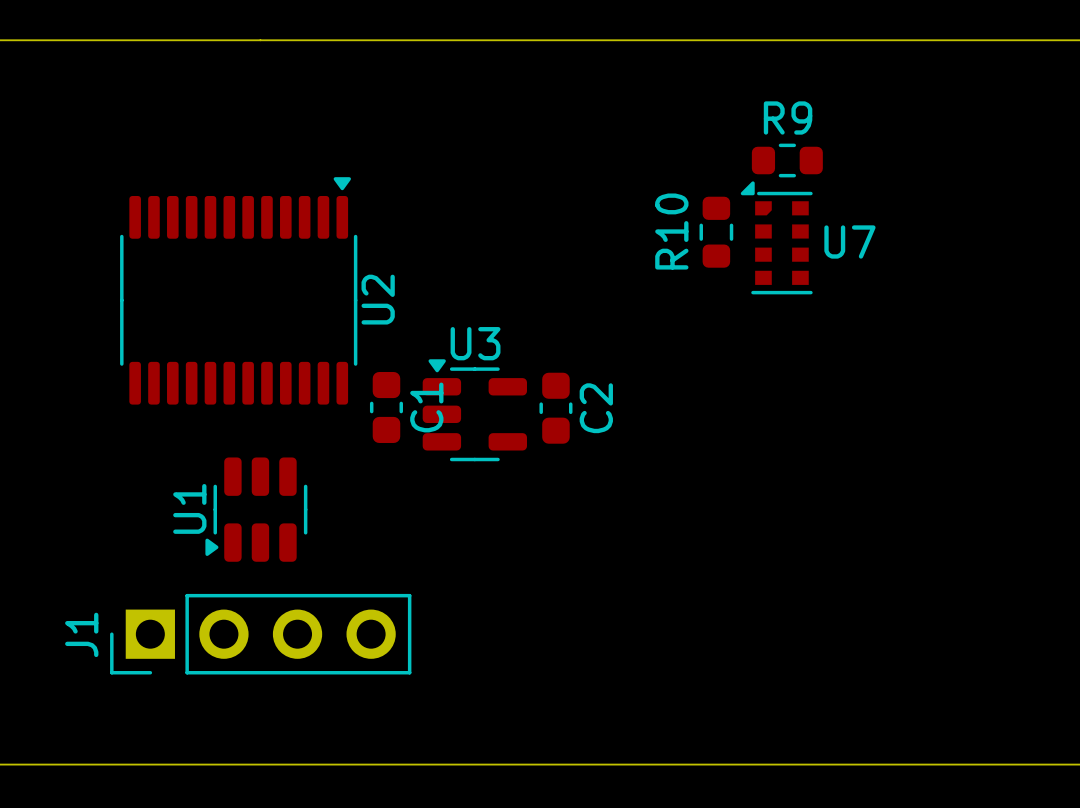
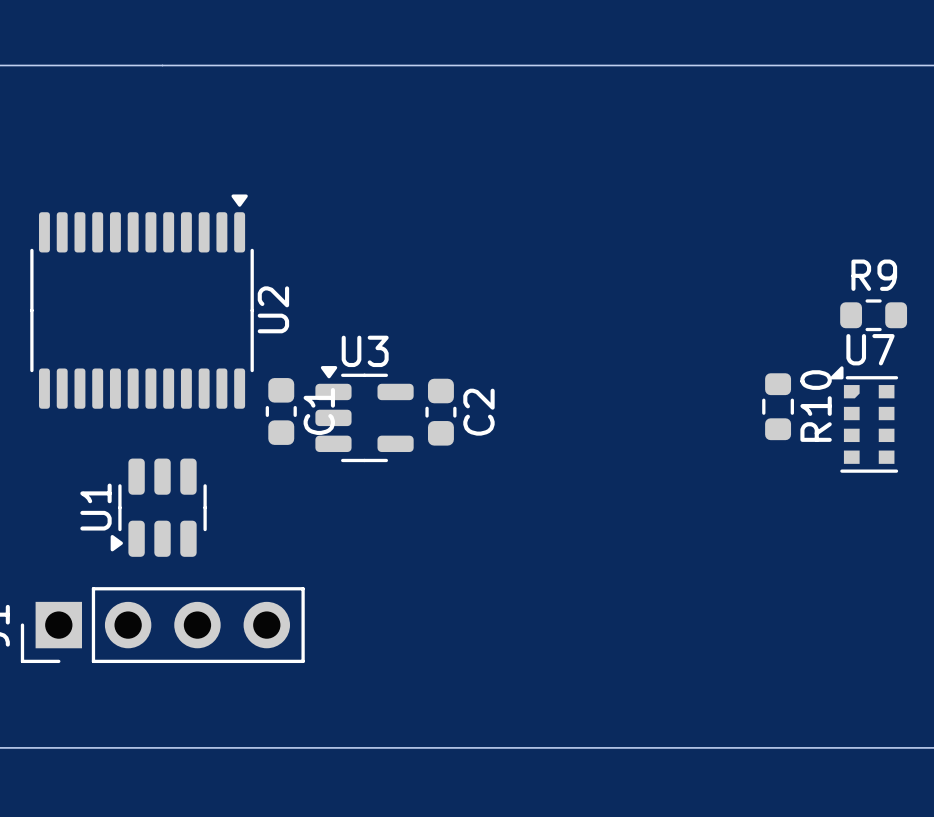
R9 position: (787, 160) -> (873, 315)
R10 name position: R10 (671, 231) -> R10 (816, 406)
R10 position: (716, 232) -> (778, 406)
U7 position: (776, 237) -> (864, 419)
U7 name position: U7 (849, 241) -> U7 (870, 349)

